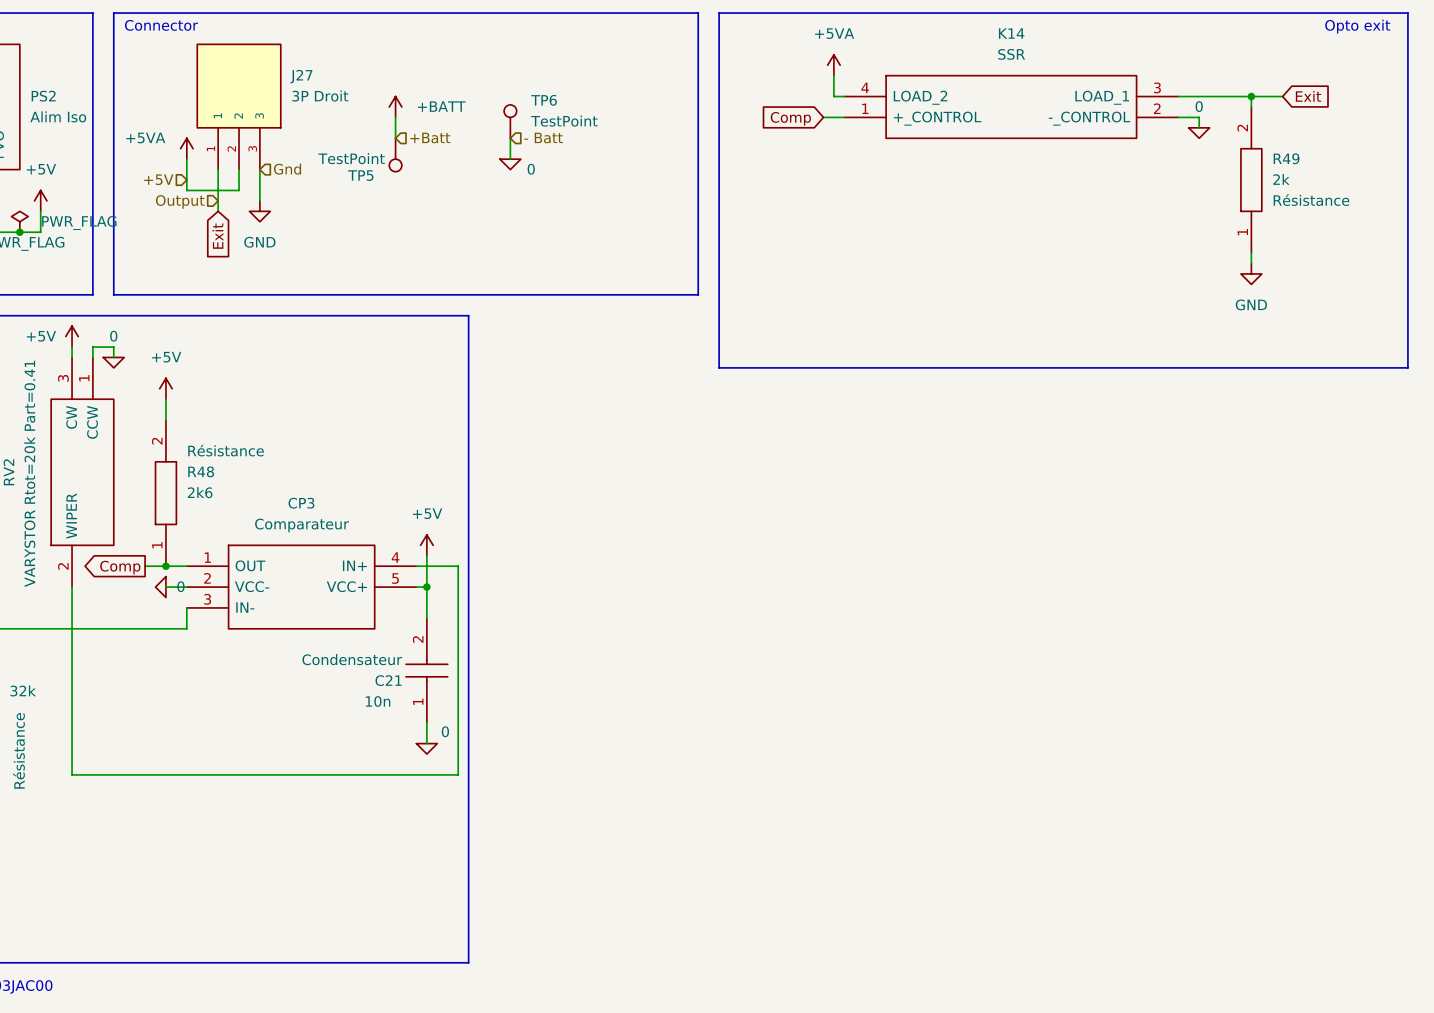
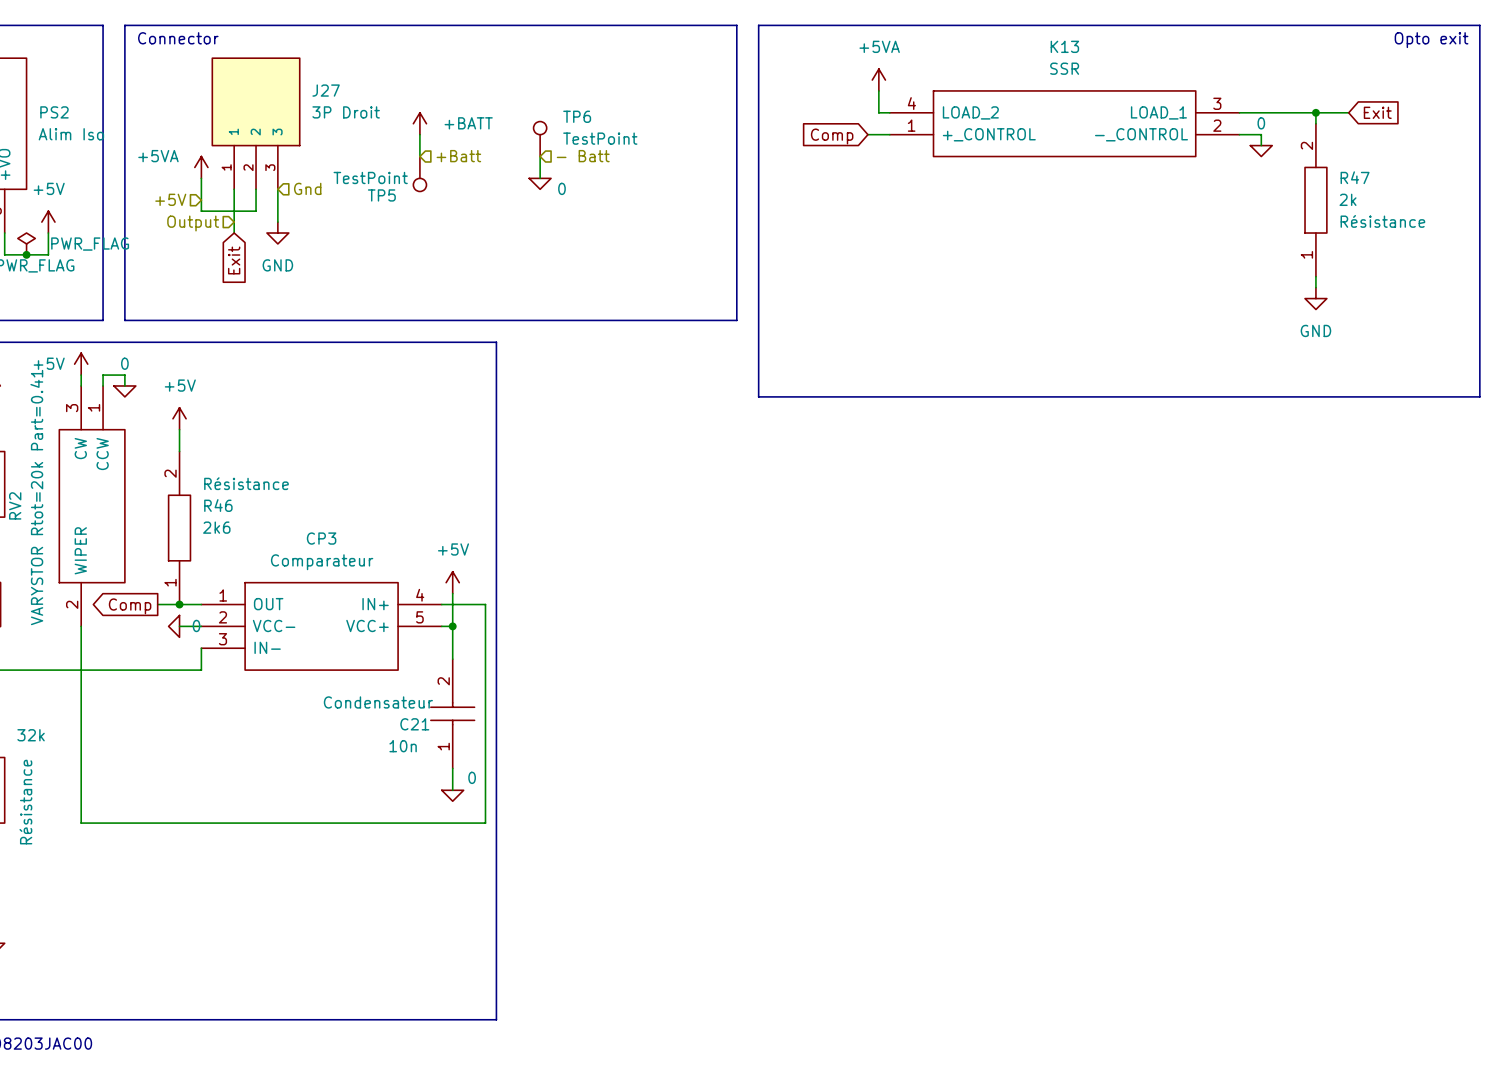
K14 name: K14 (1011, 33) -> K13 (1064, 46)
R49 name: R49 (1286, 158) -> R47 (1355, 177)
R48 name: R48 (201, 471) -> R46 (218, 505)

